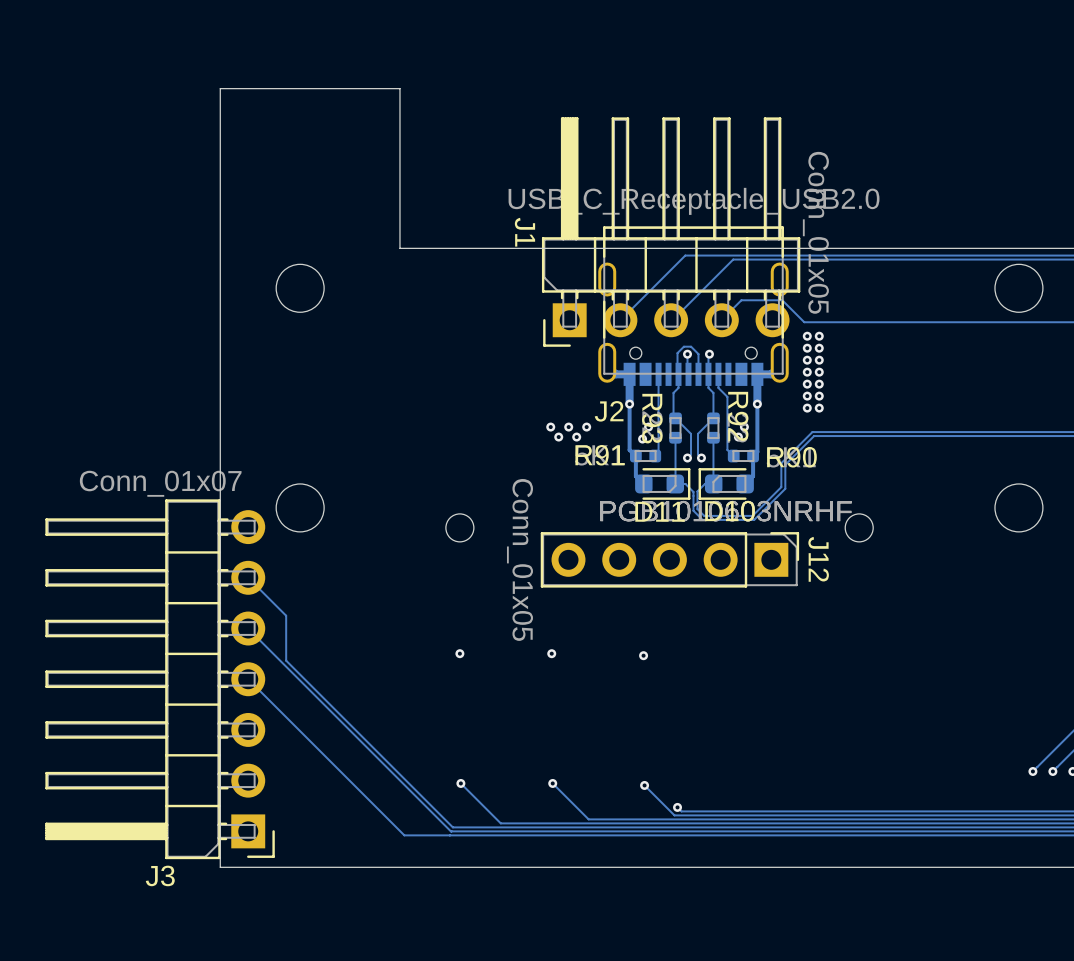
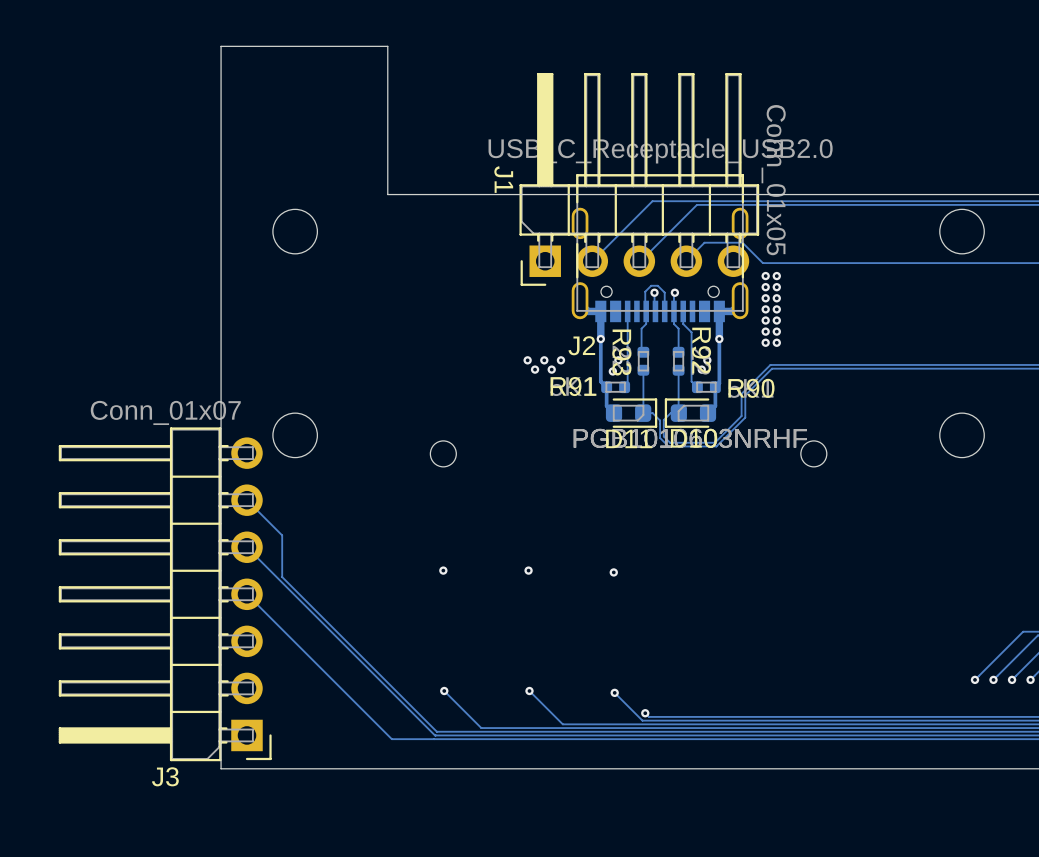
track: (675, 418) (690, 433) (690, 454) (687, 458) -> none
track: (713, 418) (697, 433) (697, 454) (701, 458) -> none
via: (687, 458) -> none
via: (701, 458) -> none
J12: Conn_01x05 (669, 559) -> none

